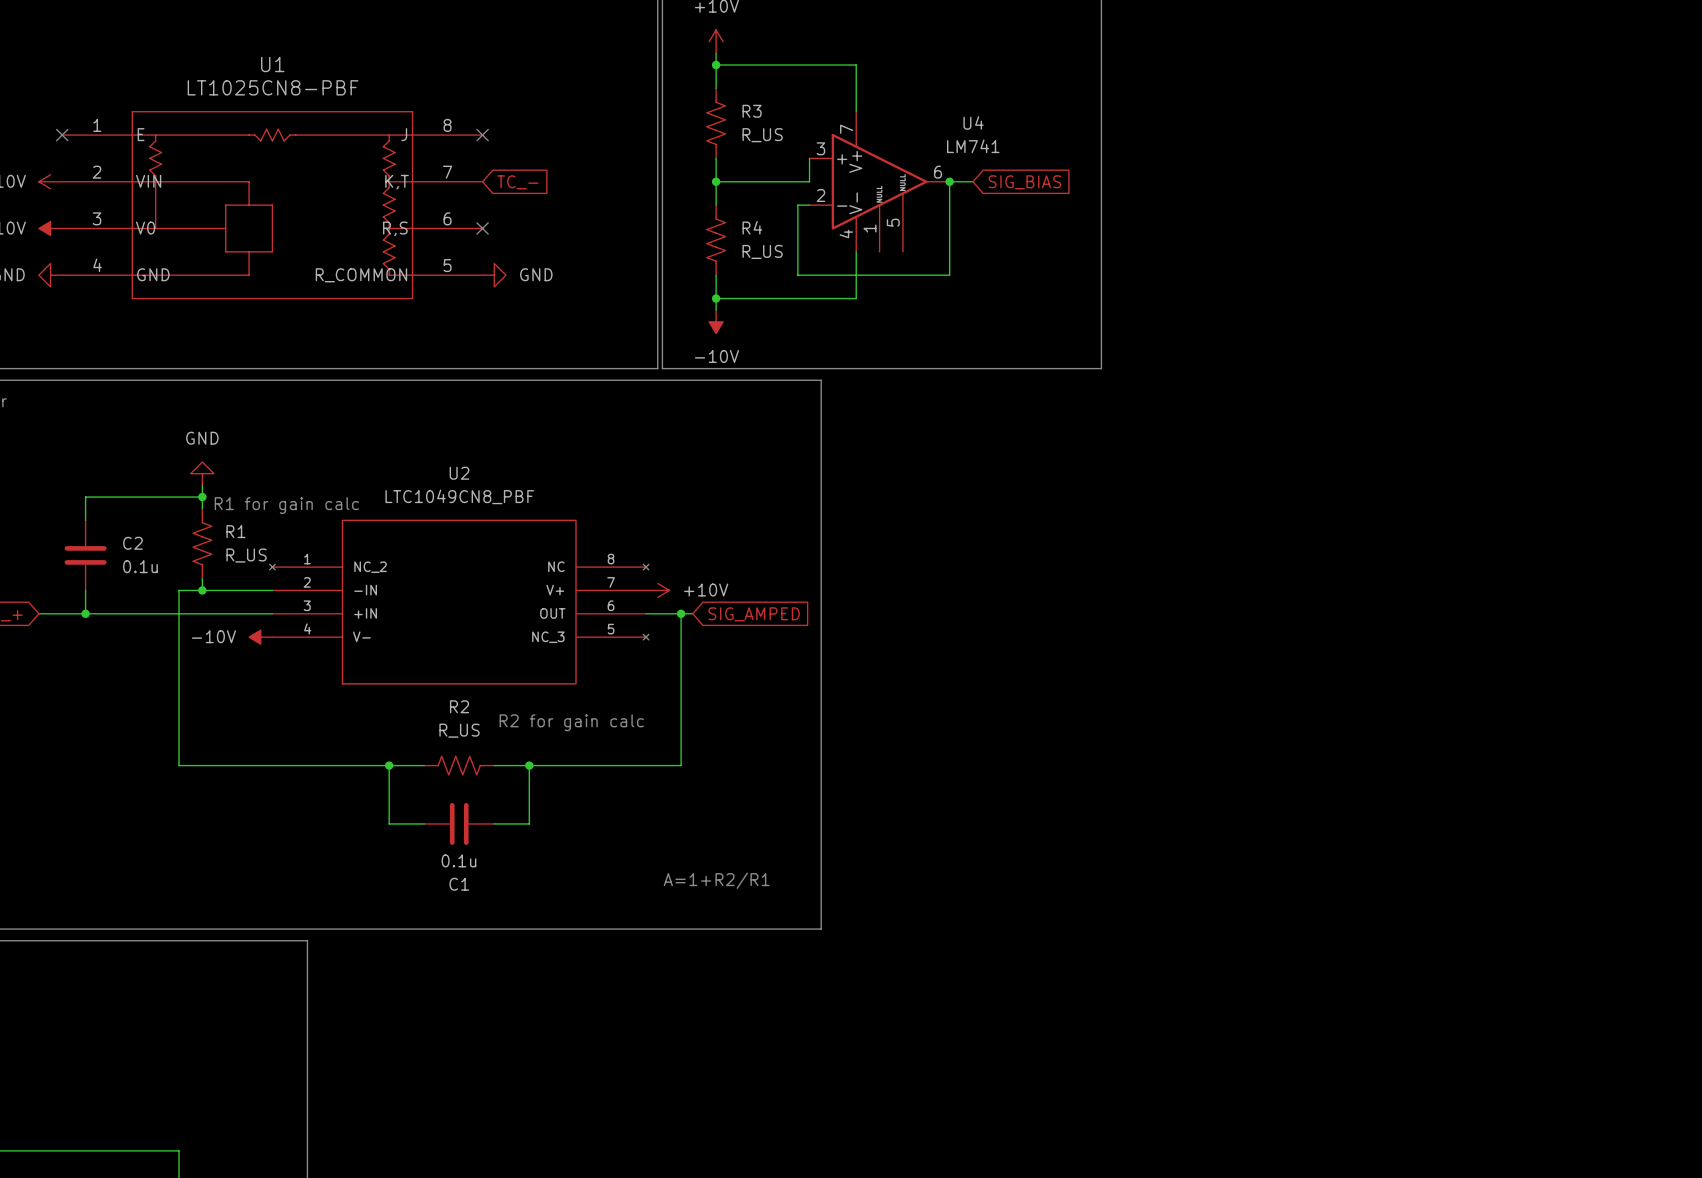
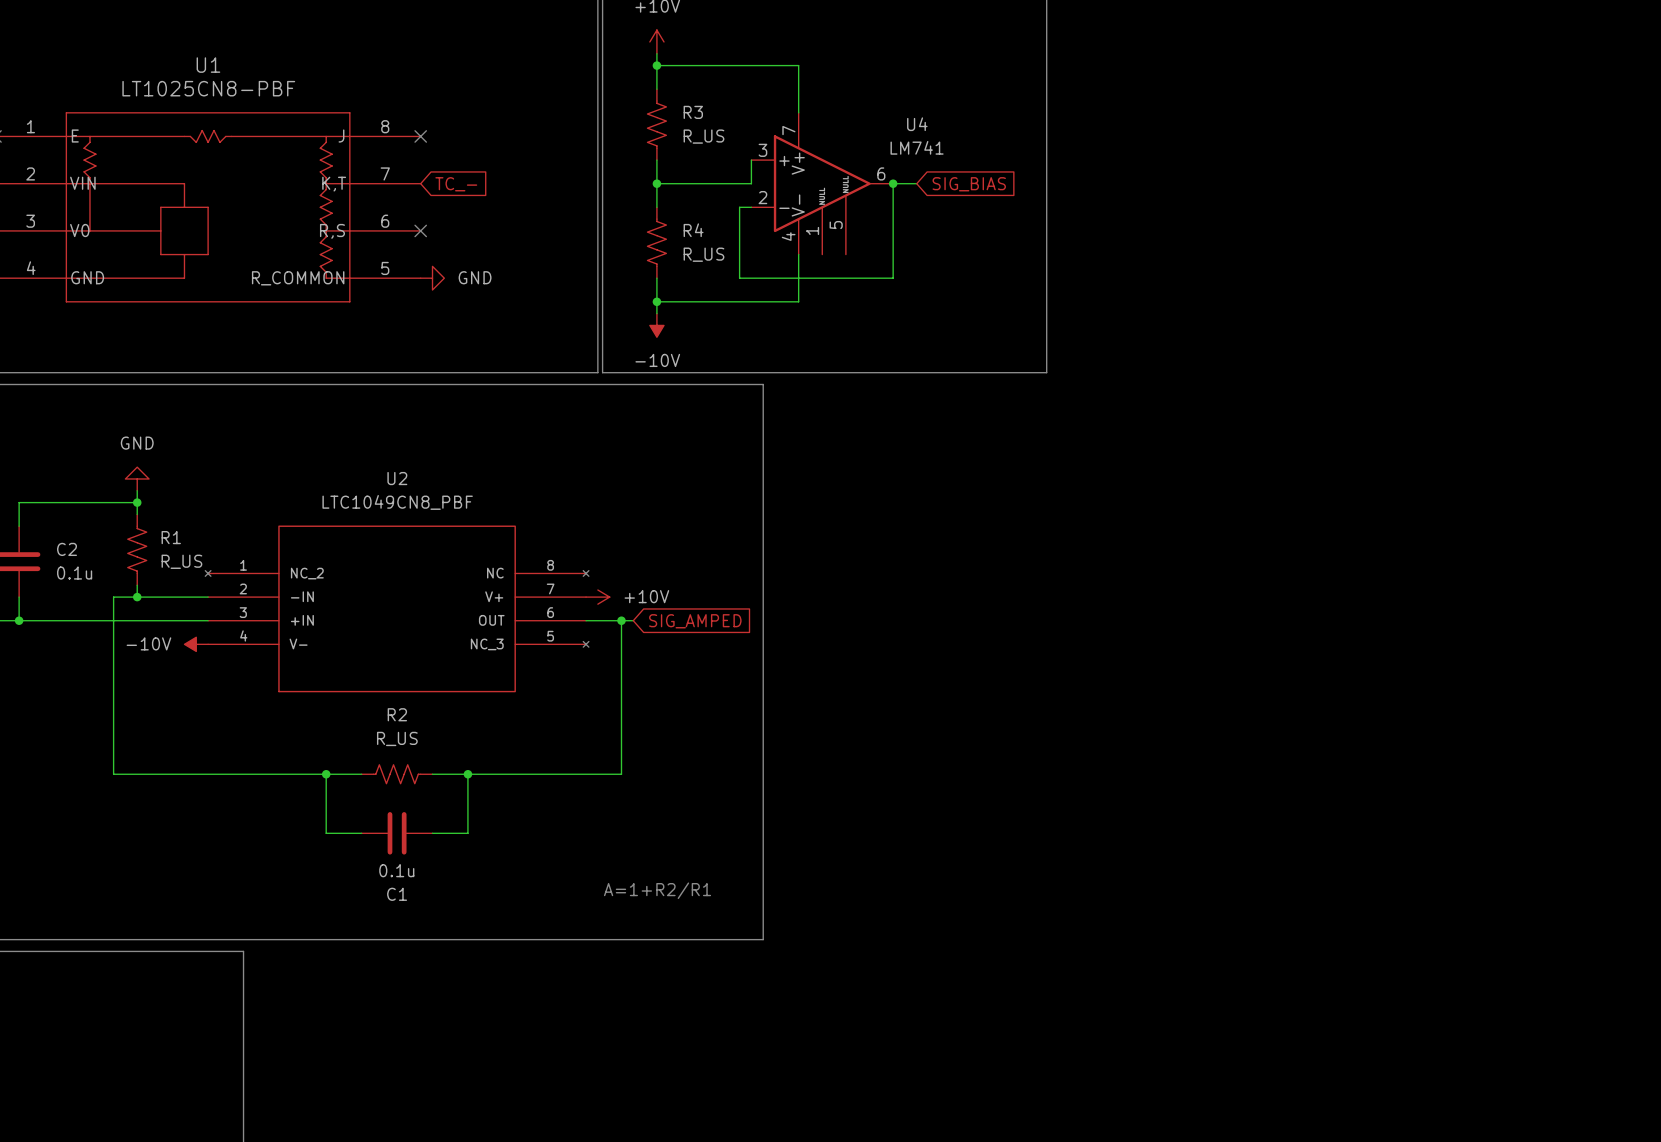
text: R1 for gain calc (286, 505) -> none
text: R2 for gain calc (571, 722) -> none

